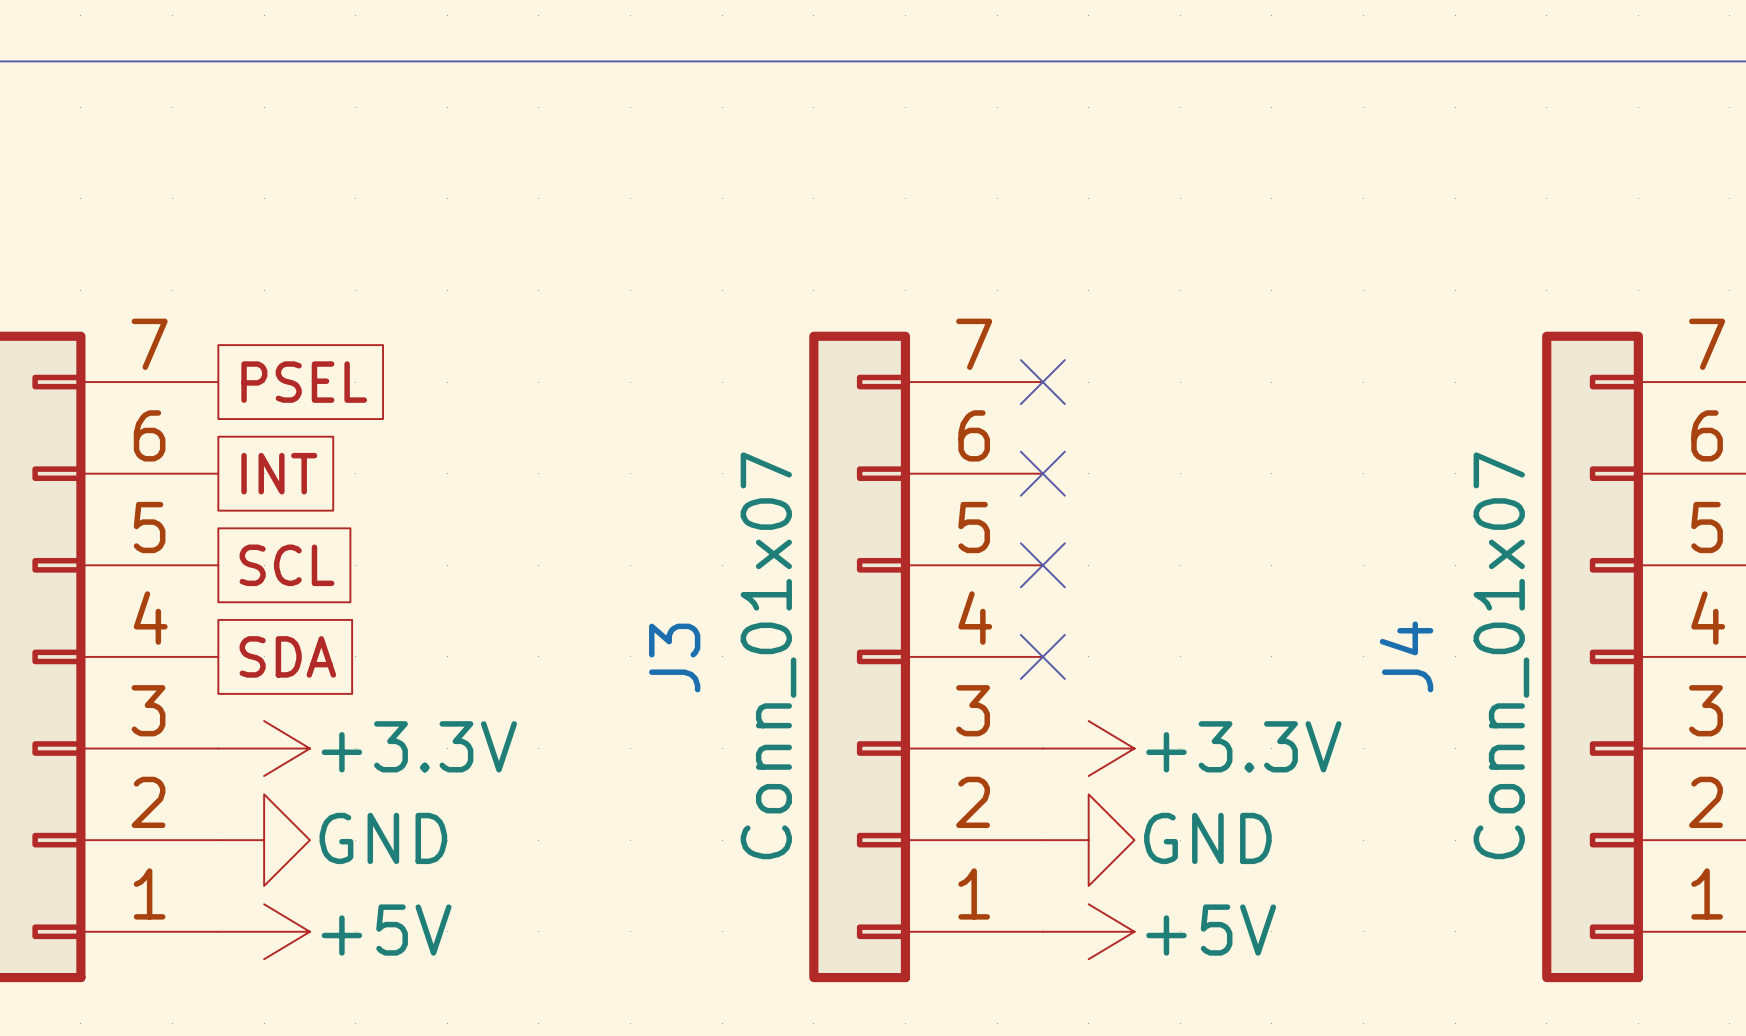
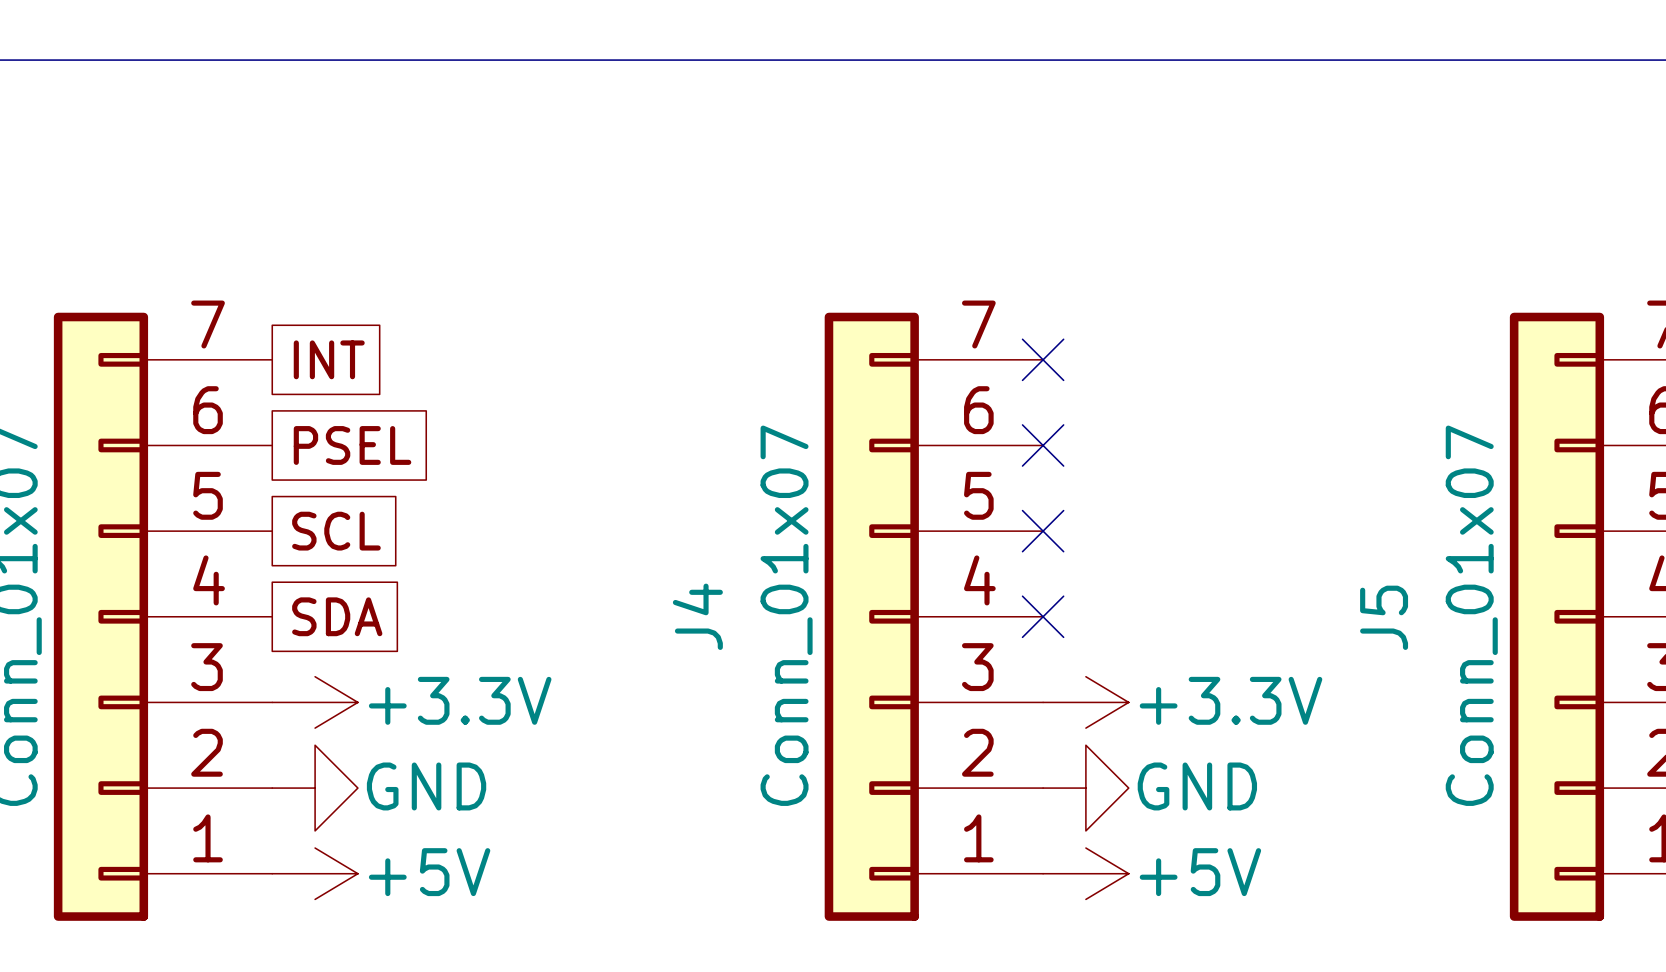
global label: PSEL (304, 382) -> INT (329, 359)
global label: INT (279, 473) -> PSEL (352, 445)
J4 name: J4 (1406, 656) -> J5 (1384, 617)
J3 name: J3 (674, 658) -> J4 (697, 616)

